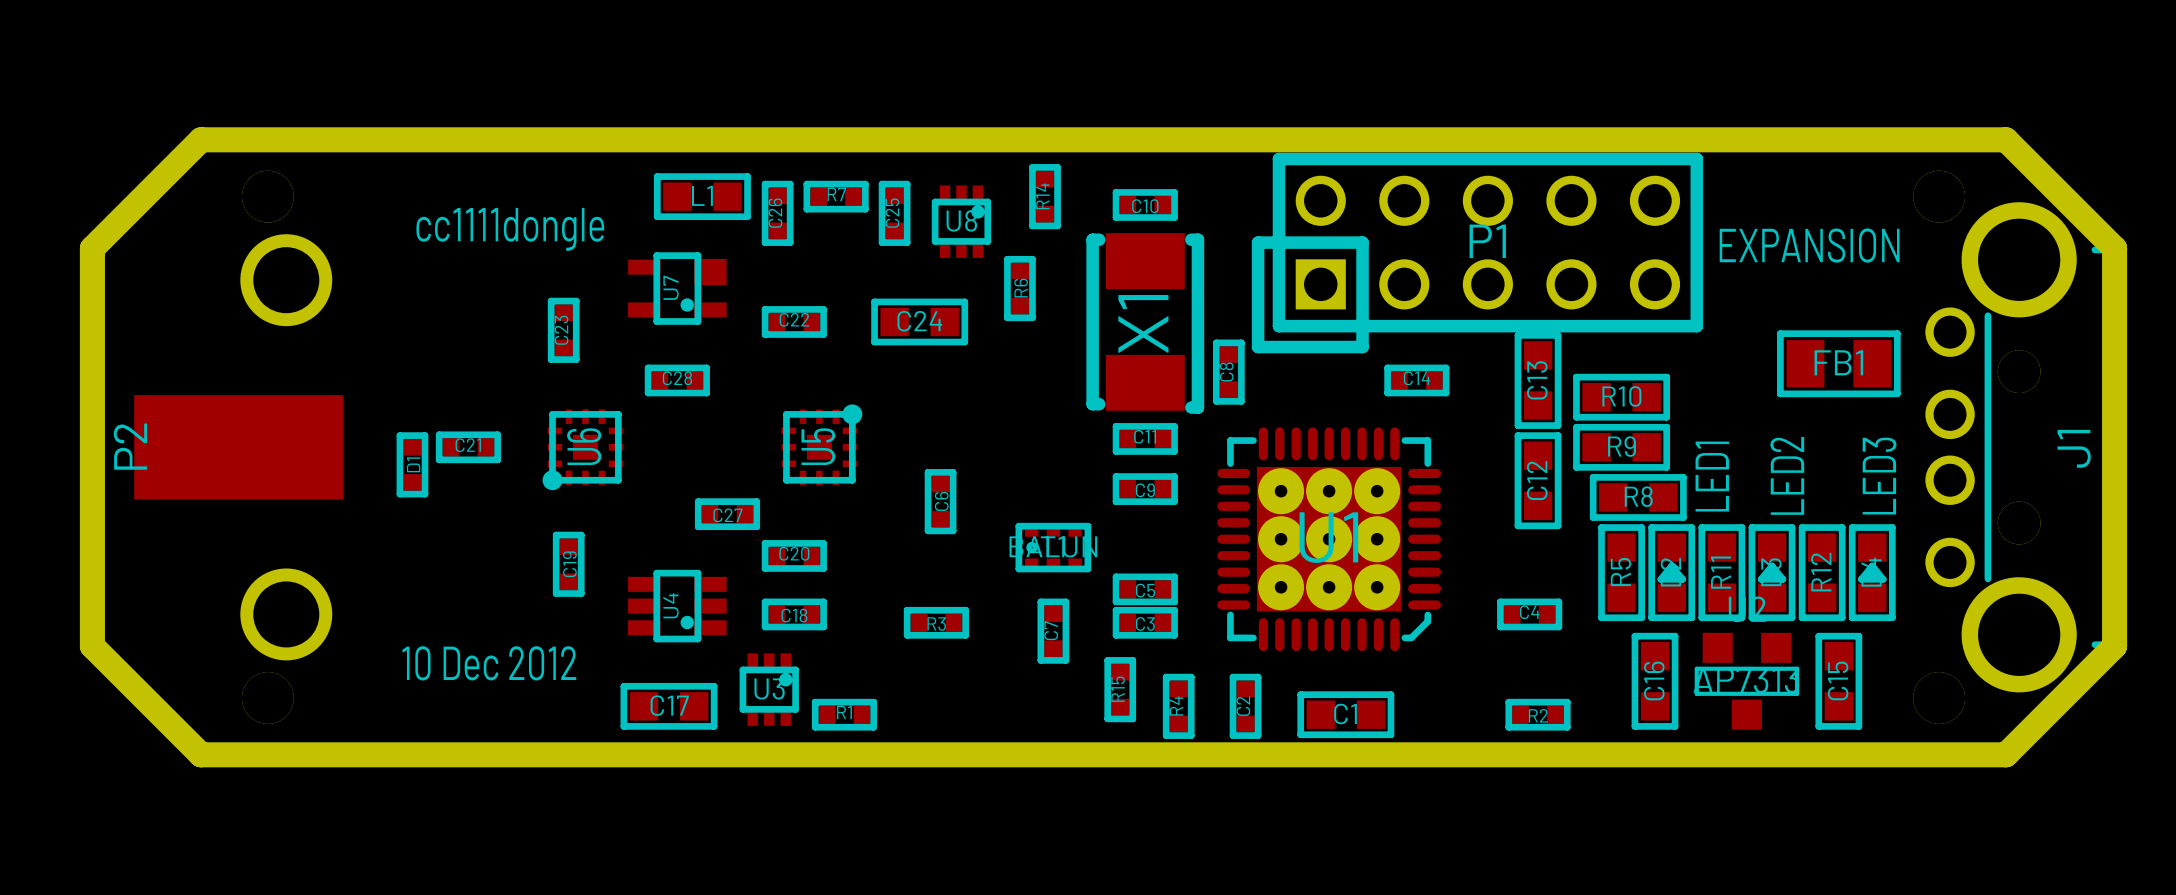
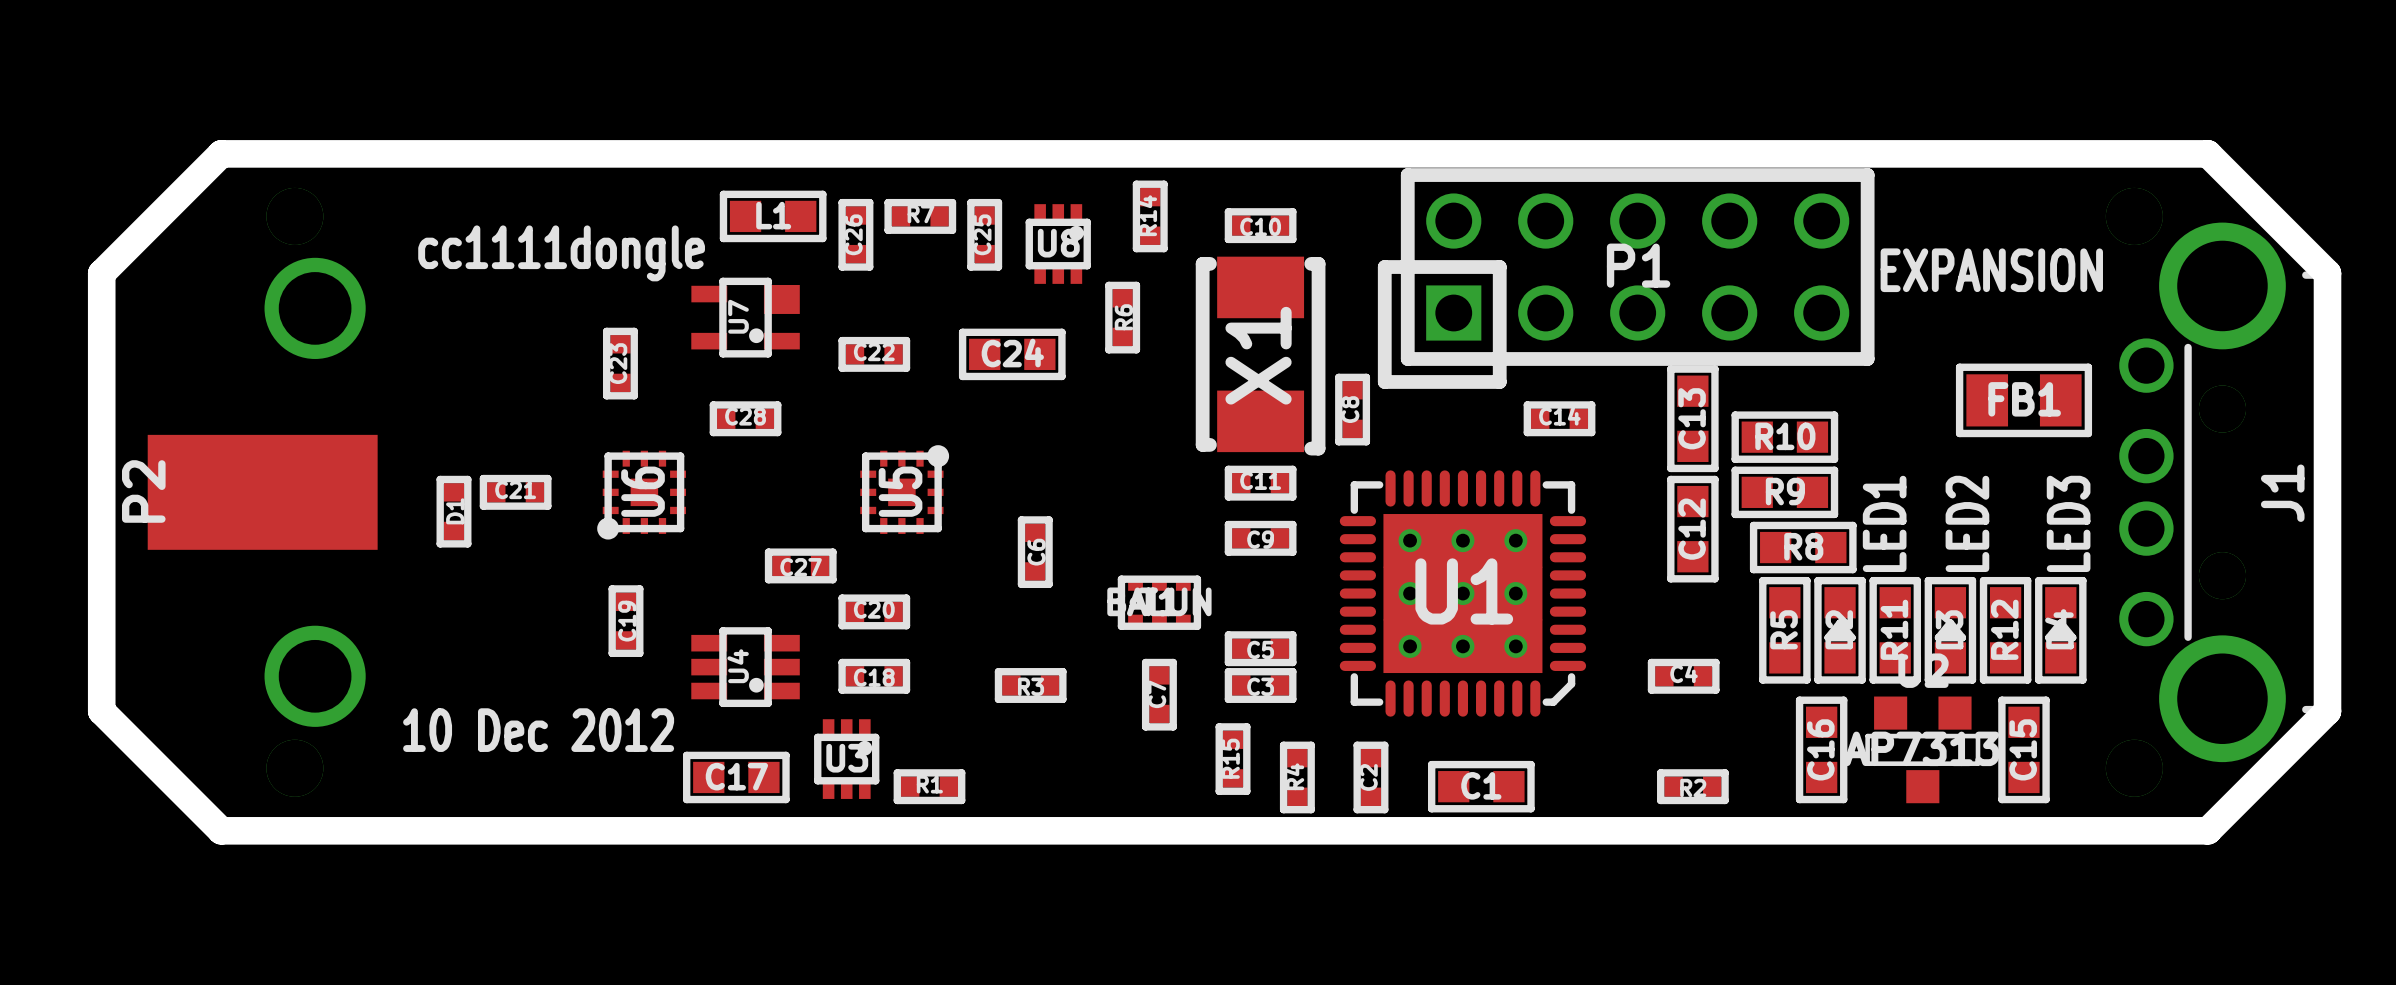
U1 footprint: [1217, 427, 1442, 652] -> [1339, 470, 1587, 717]

